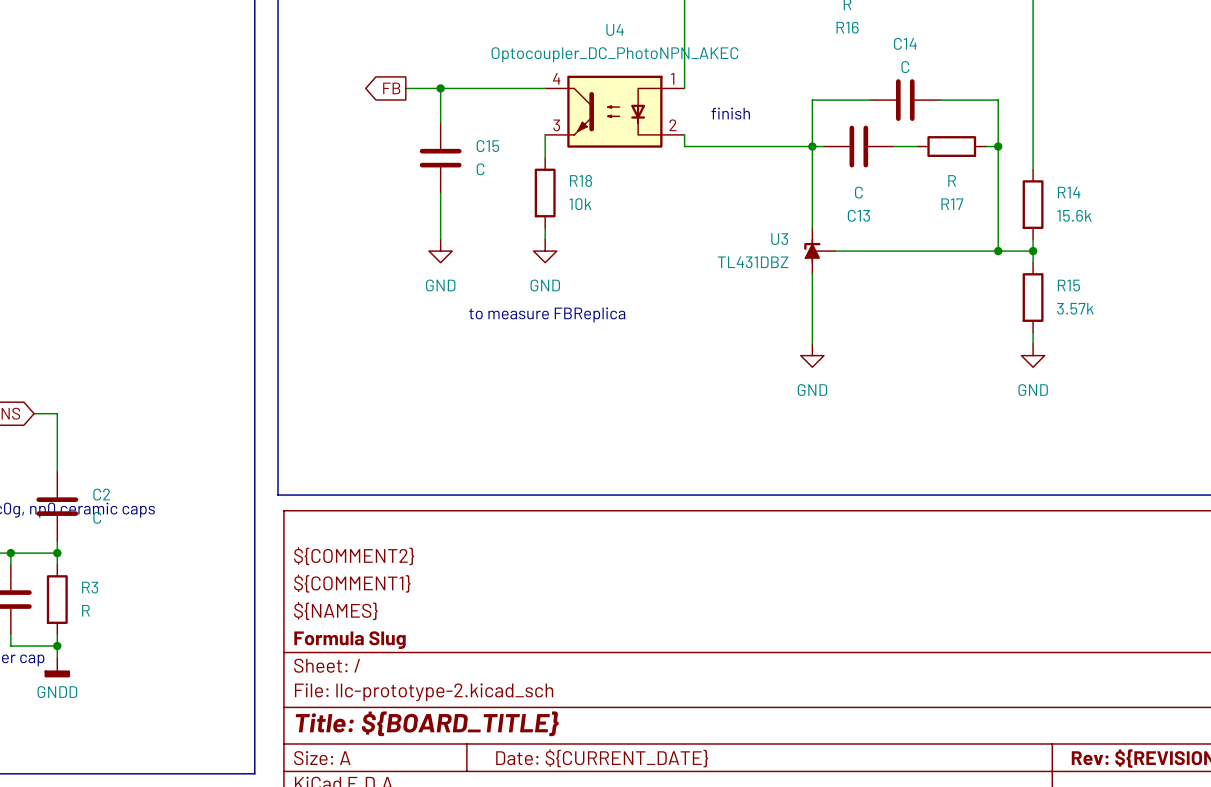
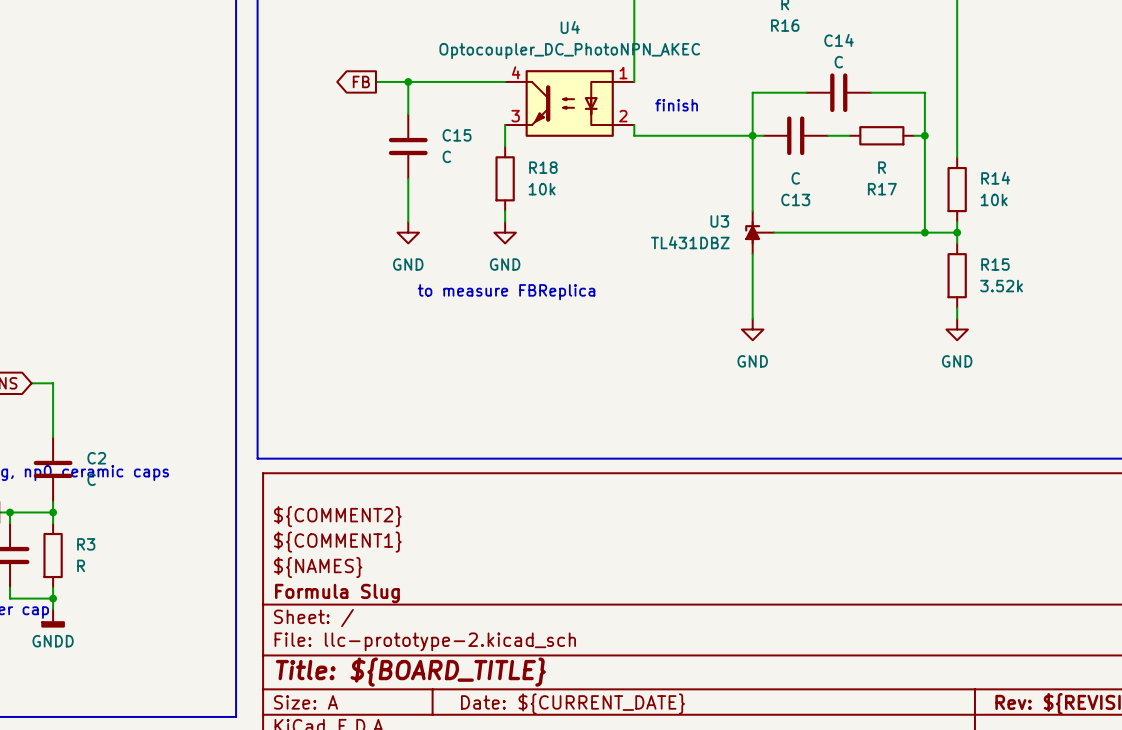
R14 value: 15.6k (1074, 215) -> 10k (994, 199)
R15 value: 3.57k (1075, 308) -> 3.52k (1001, 286)

